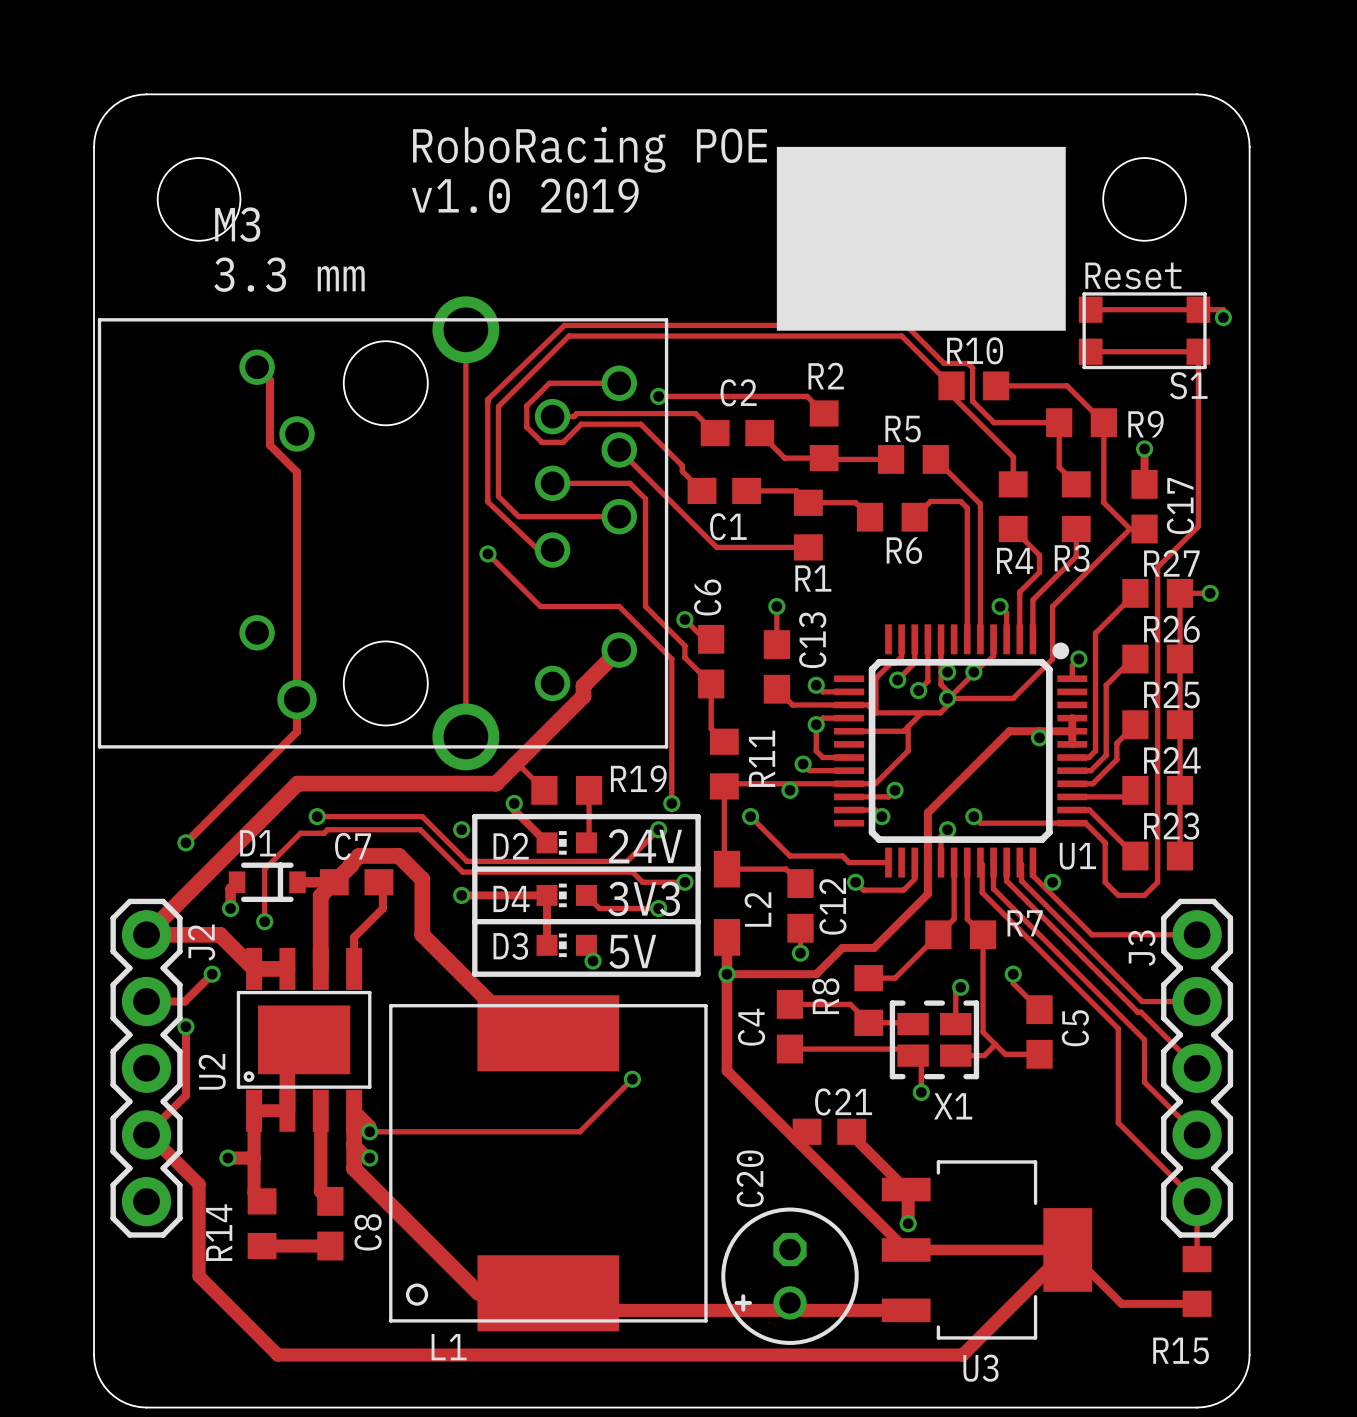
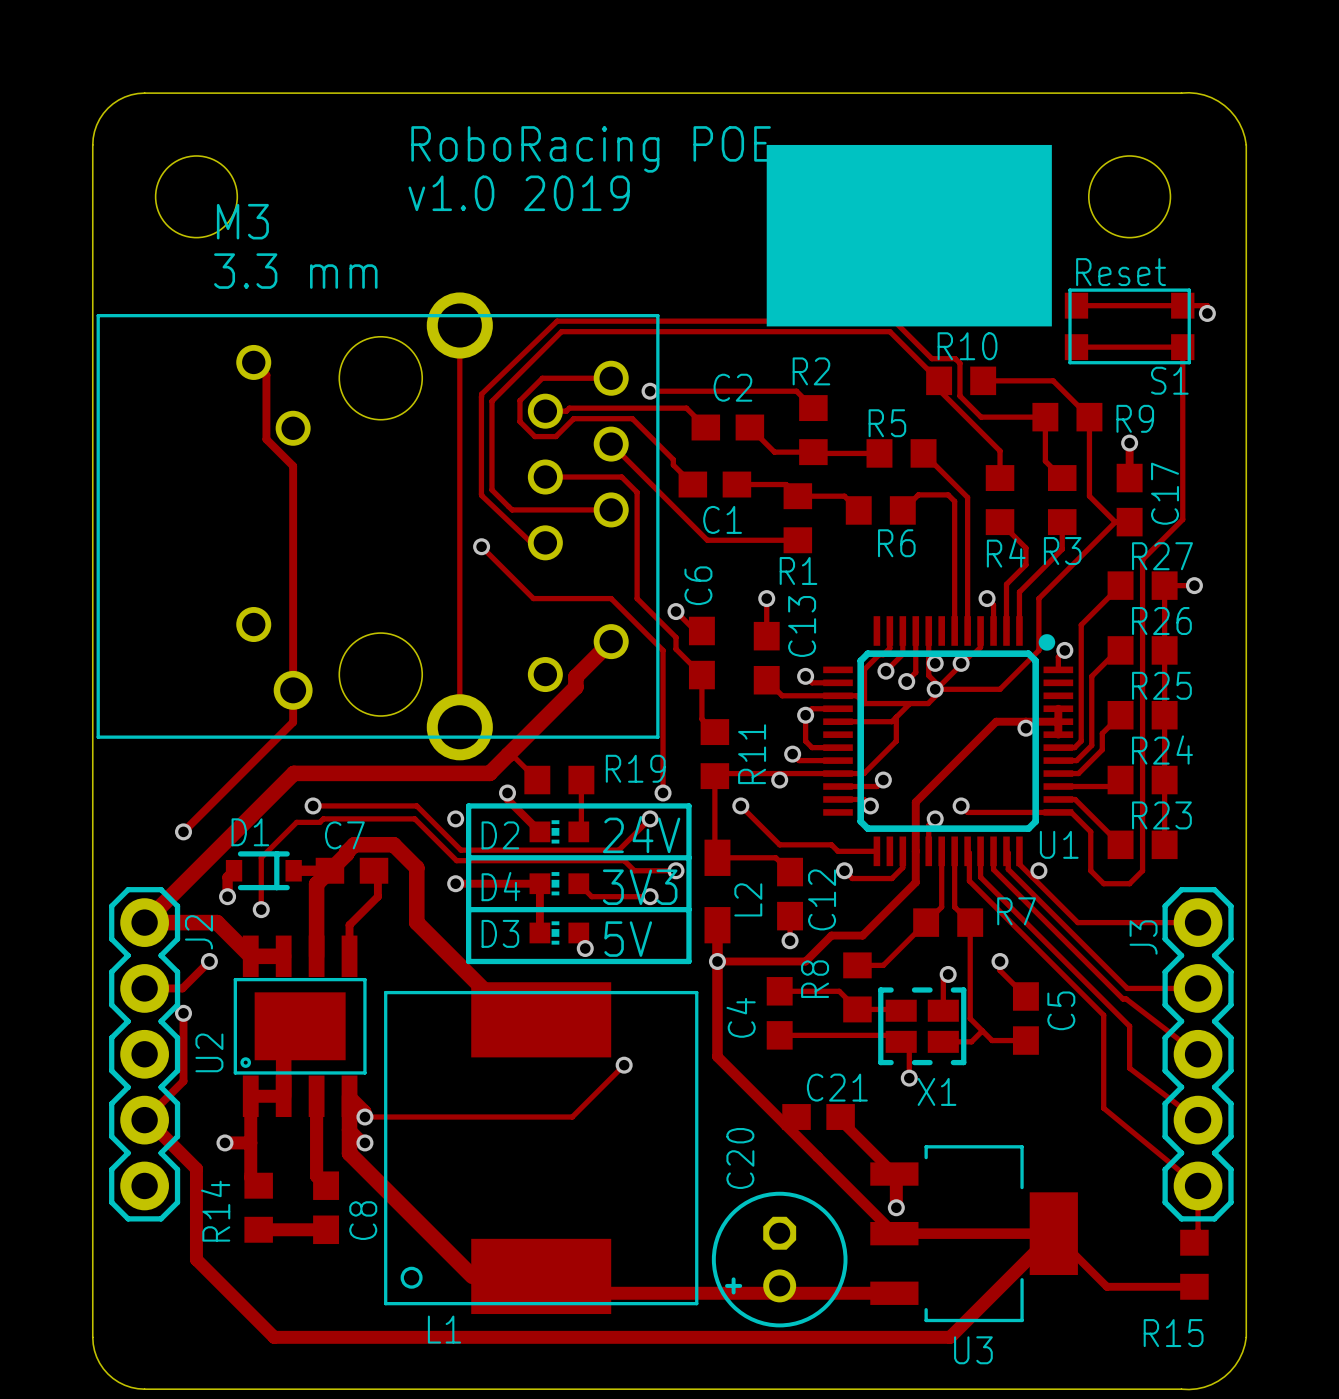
board edge: (1197, 94) (1217, 98) (1234, 109) (1245, 126) (1249, 146) (1249, 1355) (1245, 1375) (1234, 1392) (1217, 1403) (1197, 1407) -> (1181, 93) (1204, 95) (1224, 105) (1239, 123) (1246, 144) (1246, 1337) (1239, 1359) (1224, 1376) (1204, 1387) (1181, 1389)
track: (1141, 1012) (1197, 1068) -> (1126, 998) (1198, 1054)
J3 position: (1197, 1068) -> (1198, 1054)
track: (1144, 1082) (1197, 1134) -> (1129, 1068) (1198, 1120)
track: (1118, 1122) (1197, 1201) (1197, 1259) -> (1103, 1108) (1198, 1185) (1198, 1230) (1194, 1242)
R15 position: (1197, 1281) -> (1194, 1264)

